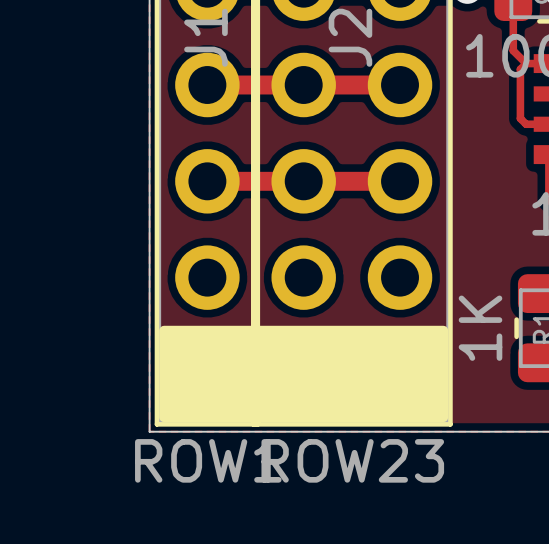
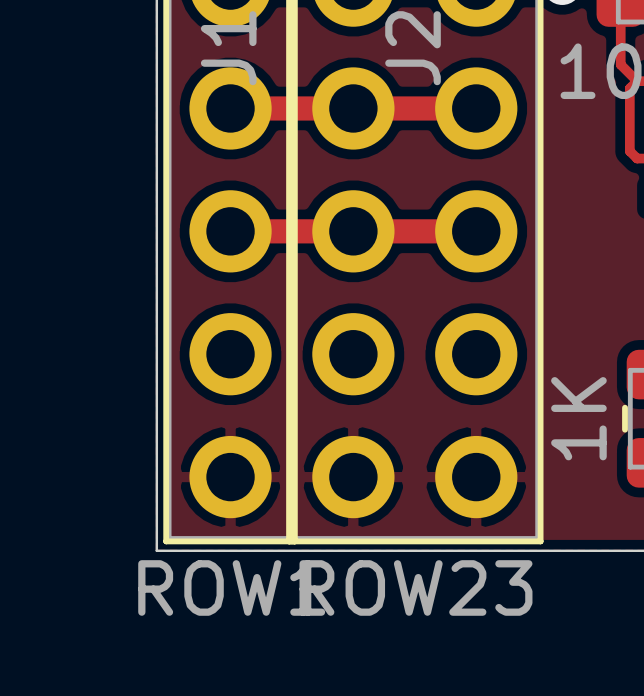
drawing: [159, 325, 449, 423] -> none

